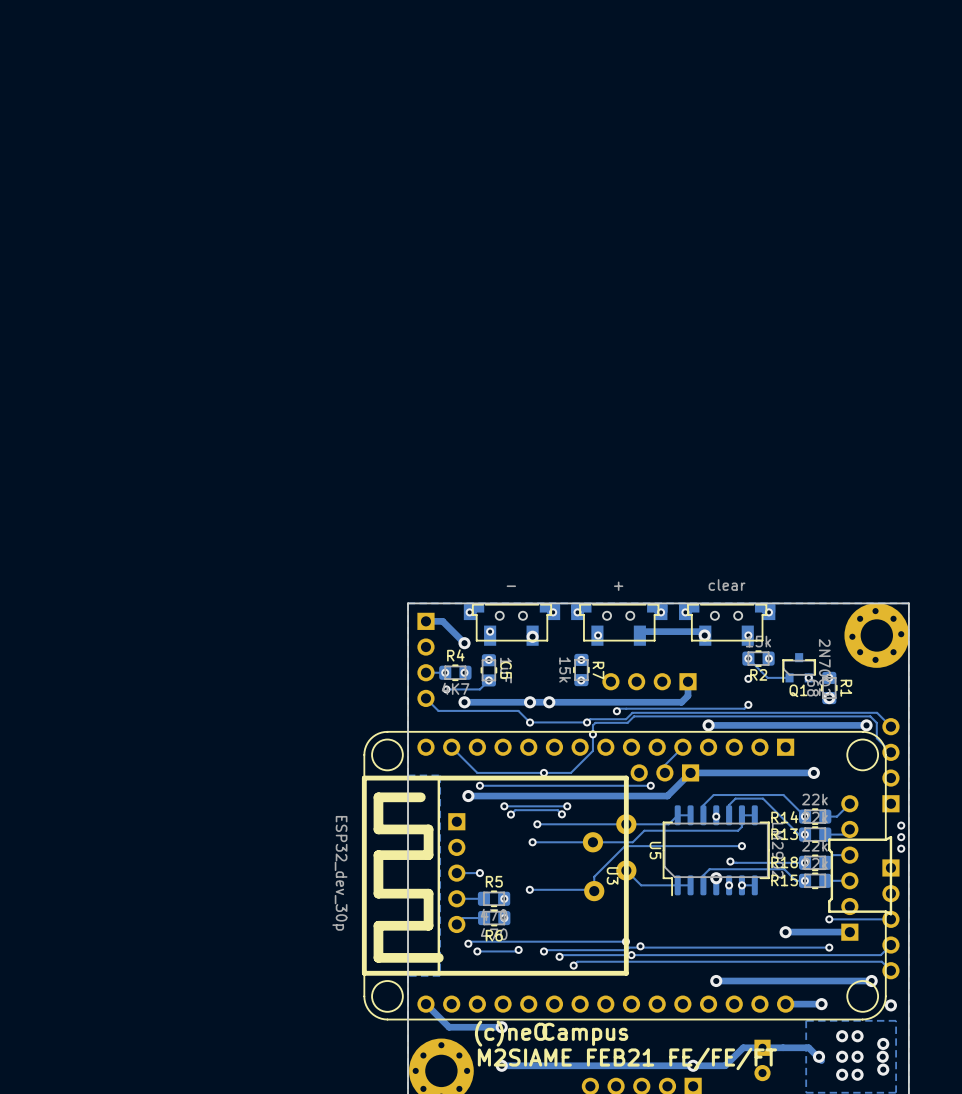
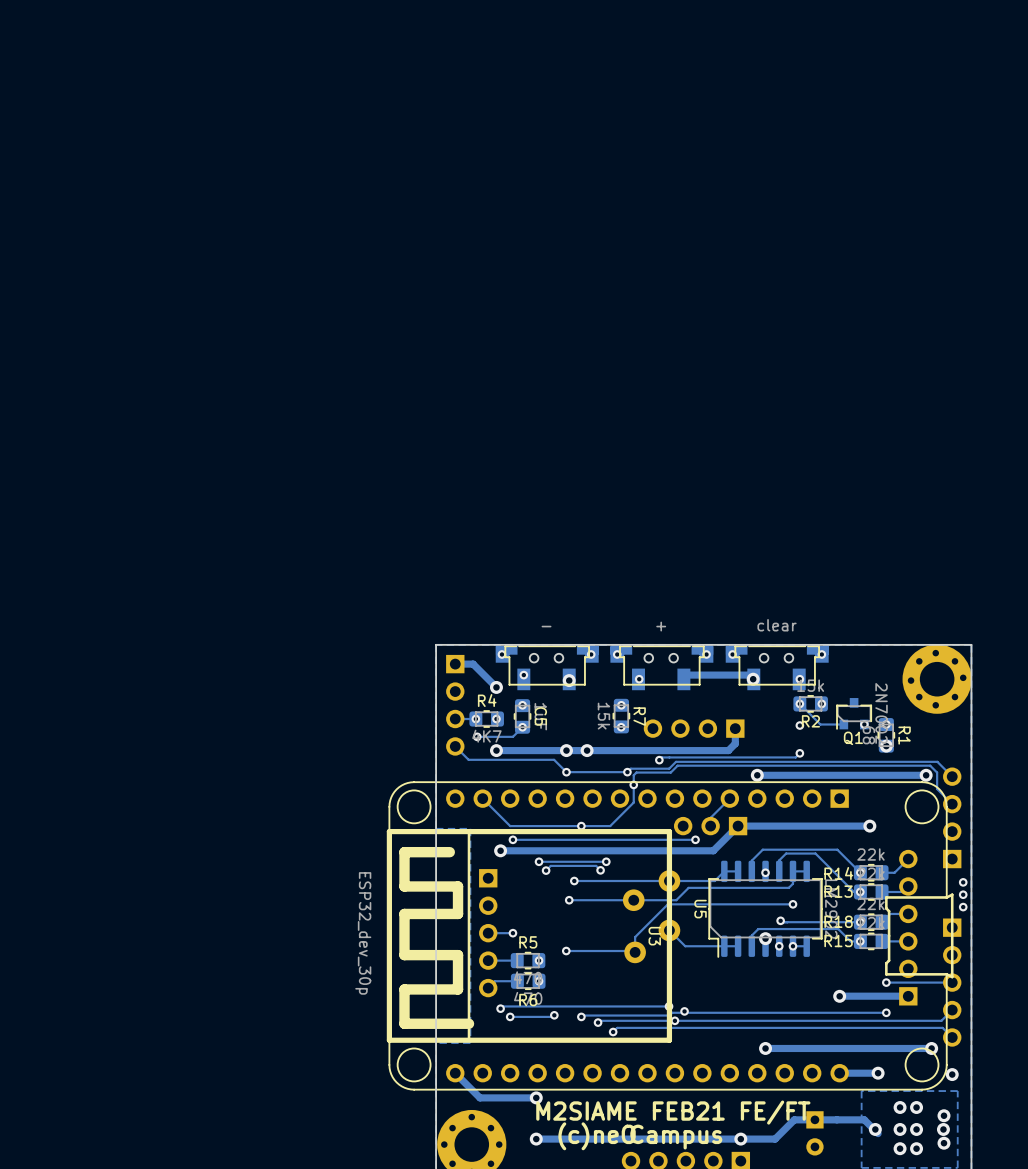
text position: (c)neO (511, 1033) -> (c)neO (597, 1136)
text: Campus (585, 1034) -> none
text: none -> M2SIAME FEB21 FE/FT (673, 1112)
text: M2SIAME FEB21 FE/FE/FT (627, 1058) -> Campus (676, 1137)

